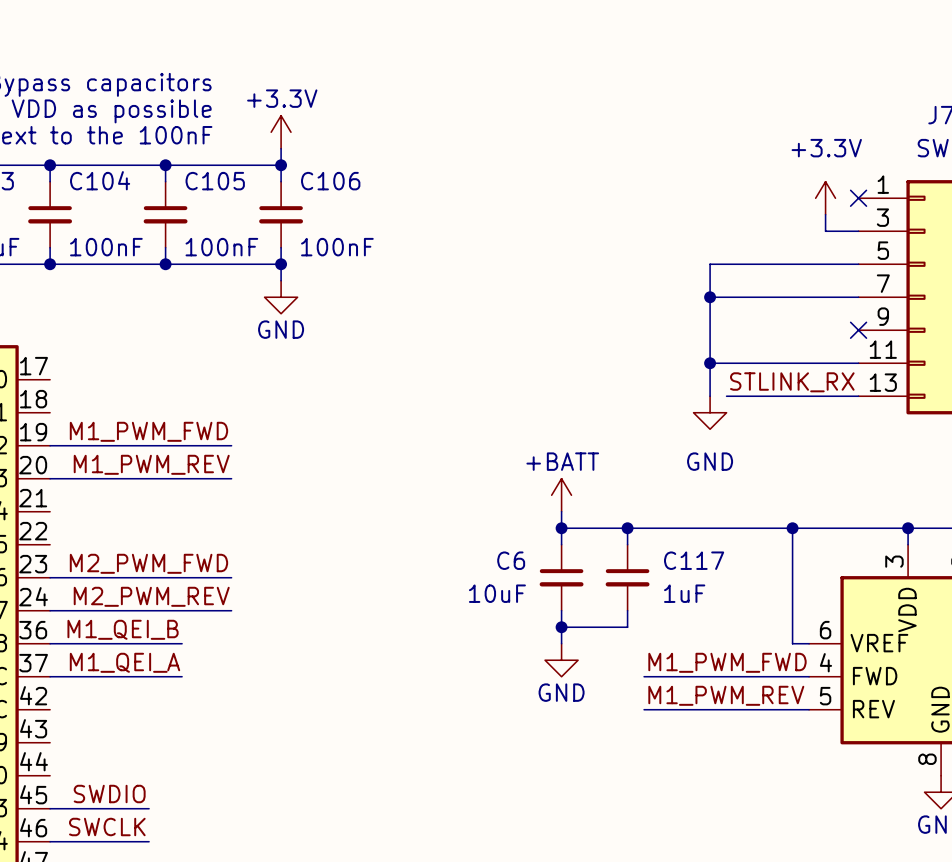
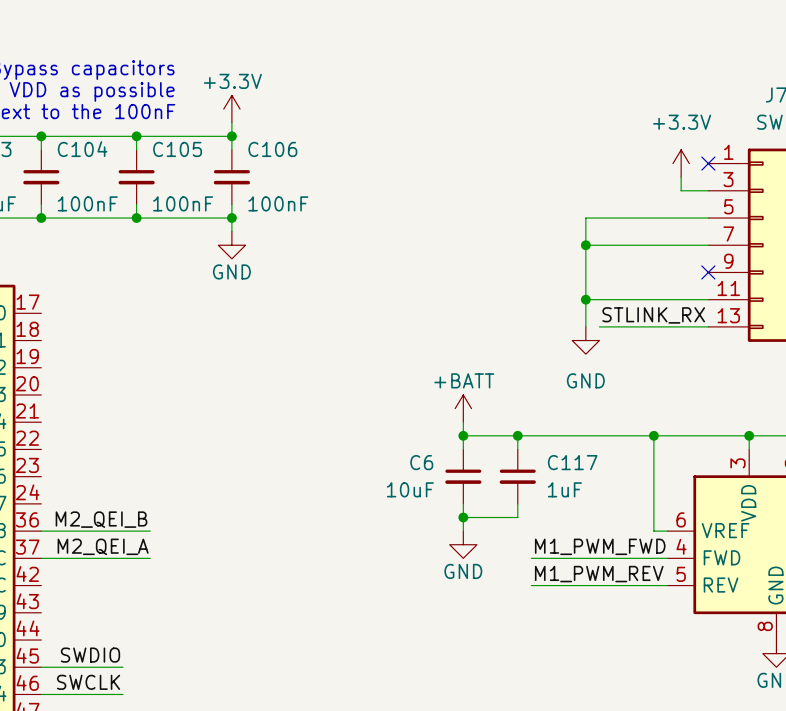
label: M1_PWM_FWD (148, 431) -> none
wire: (50, 445) (231, 445) -> none
label: M1_PWM_REV (151, 464) -> none
wire: (50, 478) (231, 478) -> none
label: M2_PWM_FWD (148, 563) -> none
wire: (50, 577) (231, 577) -> none
label: M2_PWM_REV (151, 596) -> none
wire: (50, 610) (231, 610) -> none
label: M1_QEI_B (123, 629) -> M2_QEI_B (101, 519)
label: M1_QEI_A (125, 662) -> M2_QEI_A (103, 546)

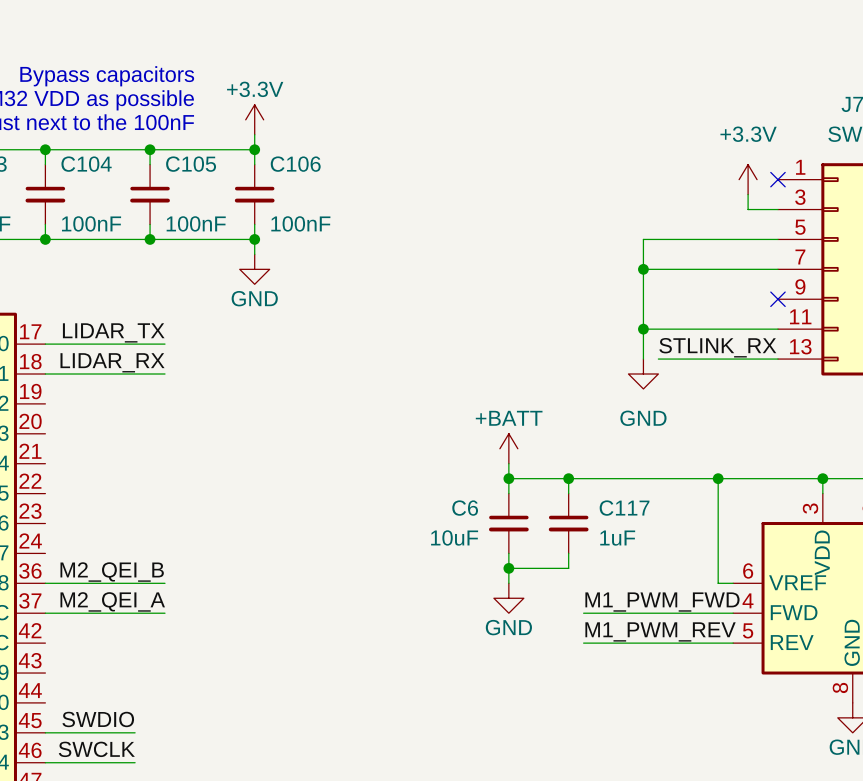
label: none -> LIDAR_TX (113, 332)
wire: none -> (45, 344) (164, 344)
label: none -> LIDAR_RX (112, 362)
wire: none -> (45, 374) (164, 374)

